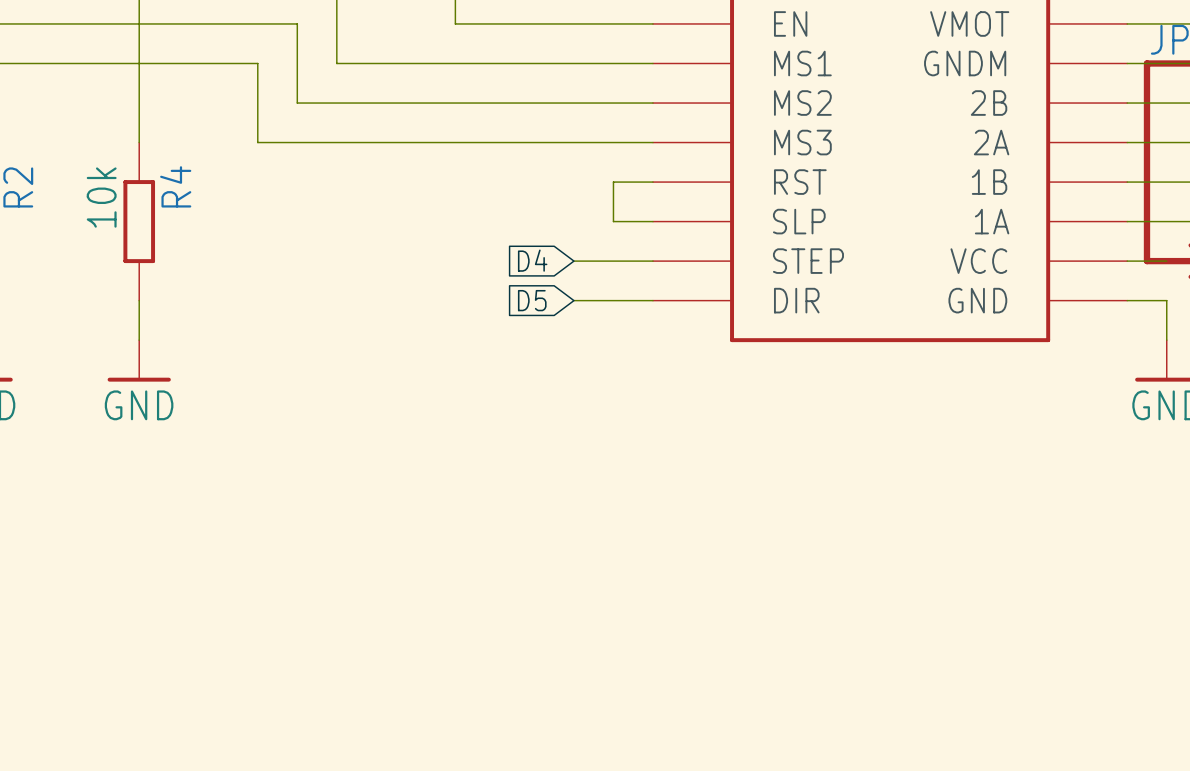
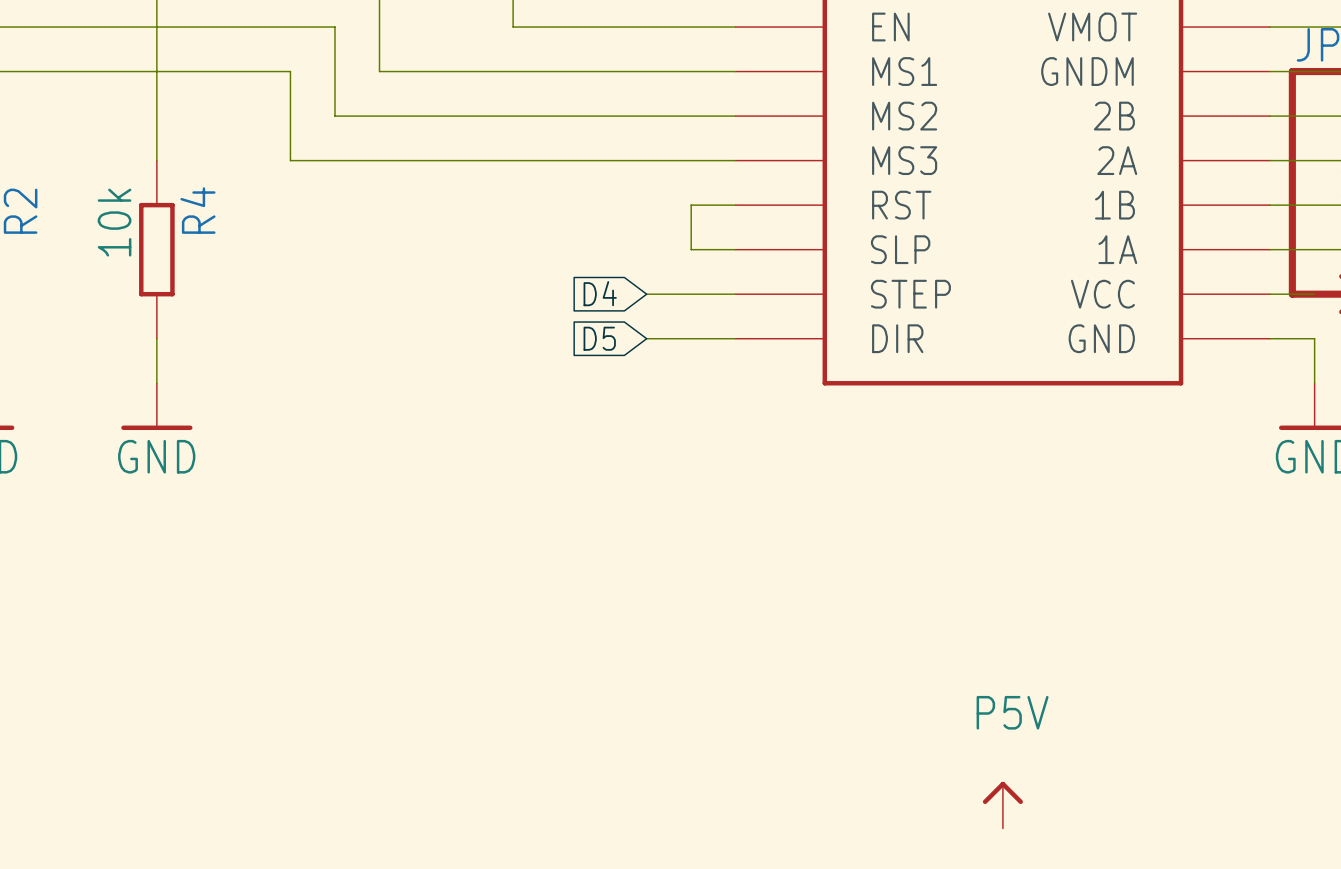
power symbol: none -> P5V (1002, 805)

